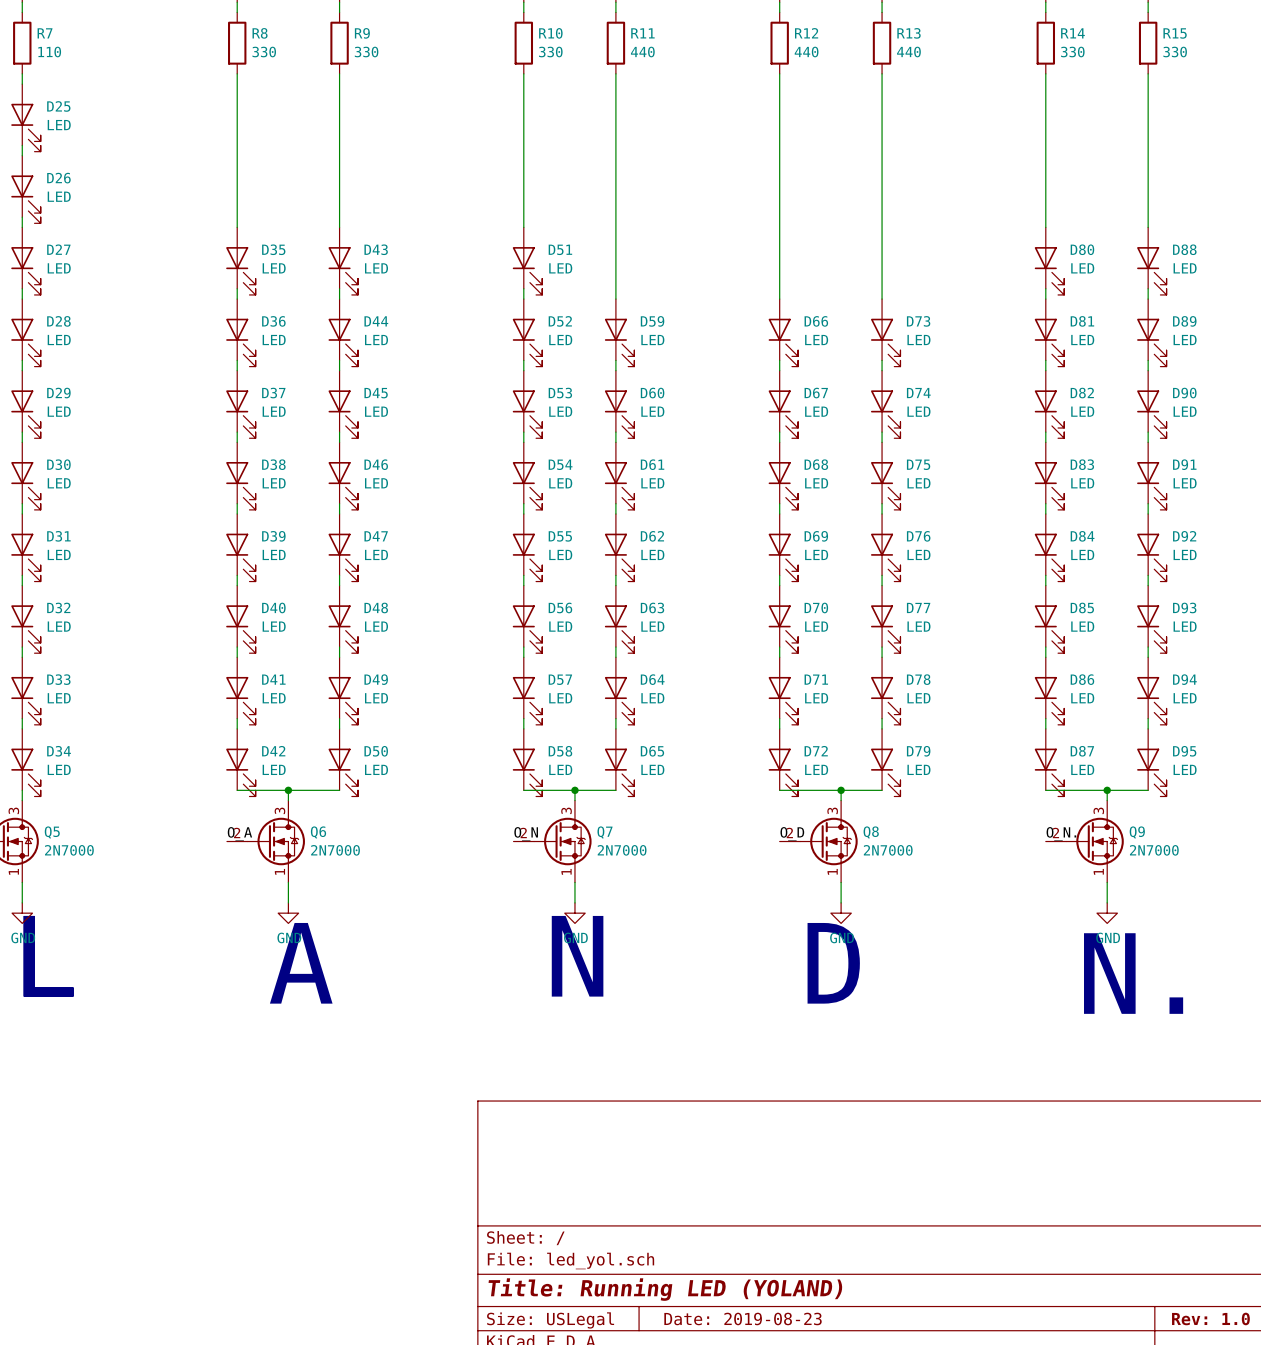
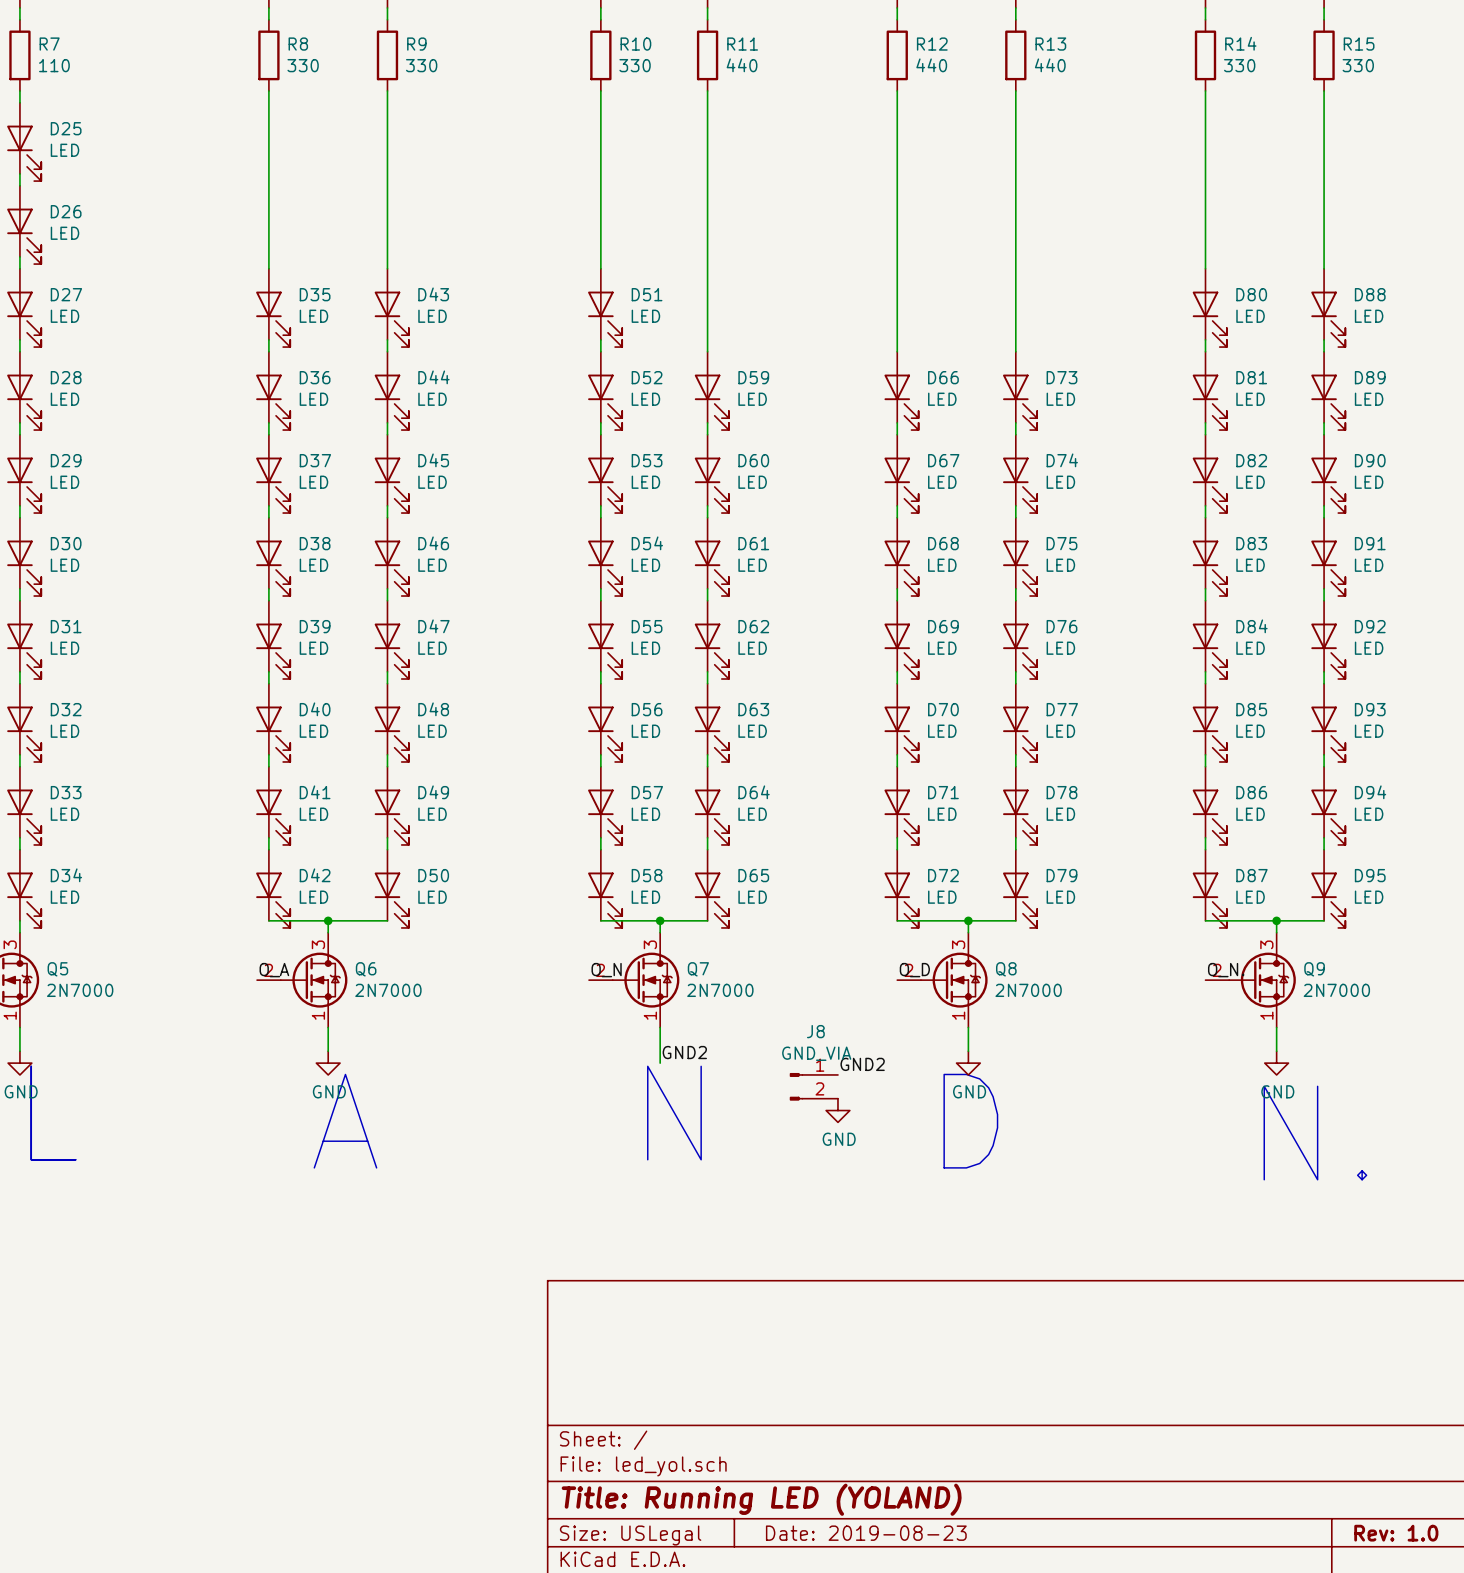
label: none -> GND2 (684, 1052)
power symbol position: GND (574, 913) -> GND (837, 1110)
label: none -> GND2 (862, 1064)
J8: none -> GND_VIA (813, 1086)

